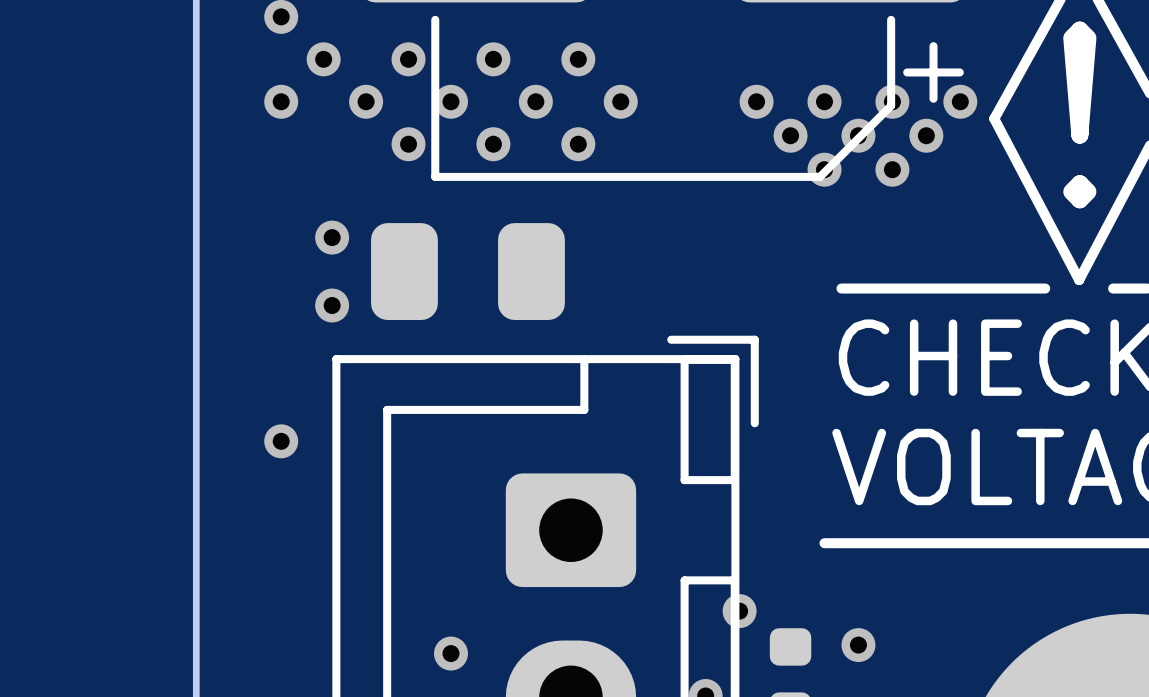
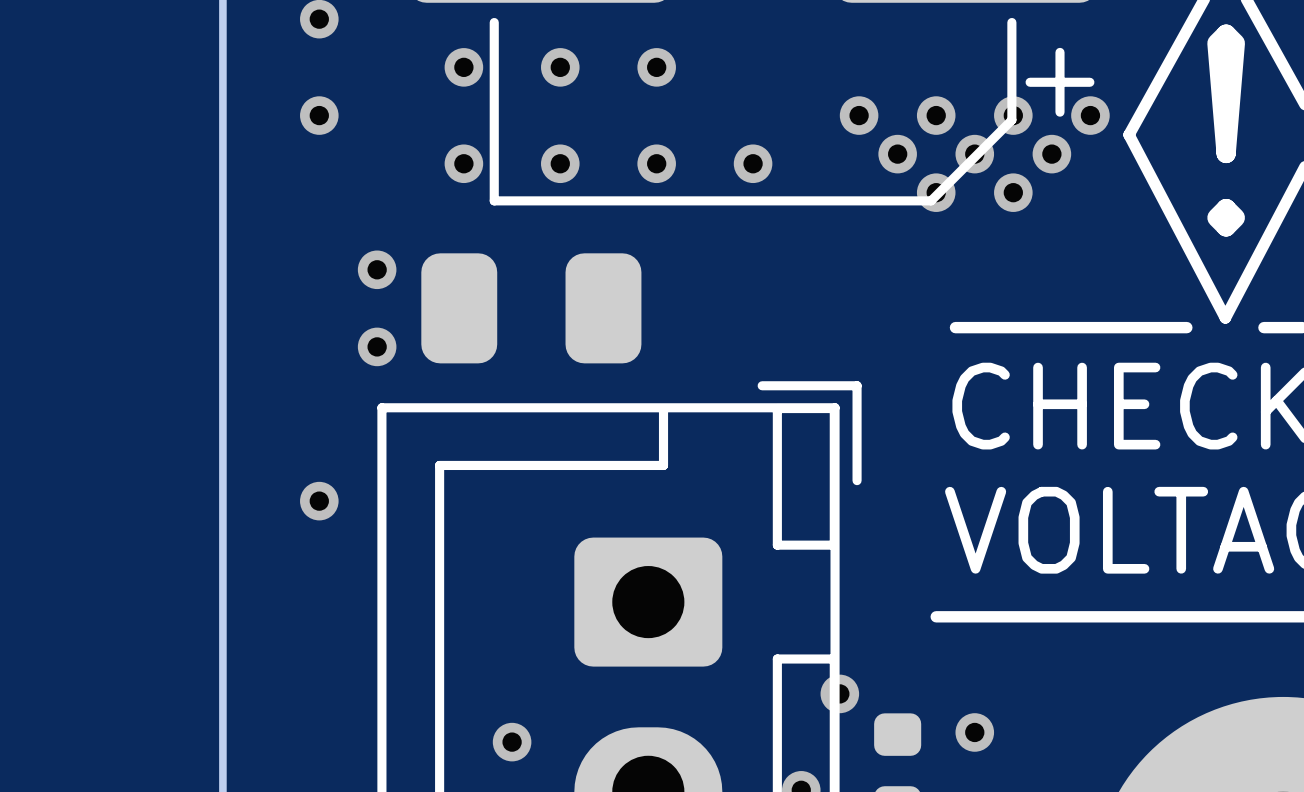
via: (323, 59) -> none
via: (366, 101) -> none
via: (450, 101) -> none
via: (535, 101) -> none
via position: (620, 101) -> (753, 163)

